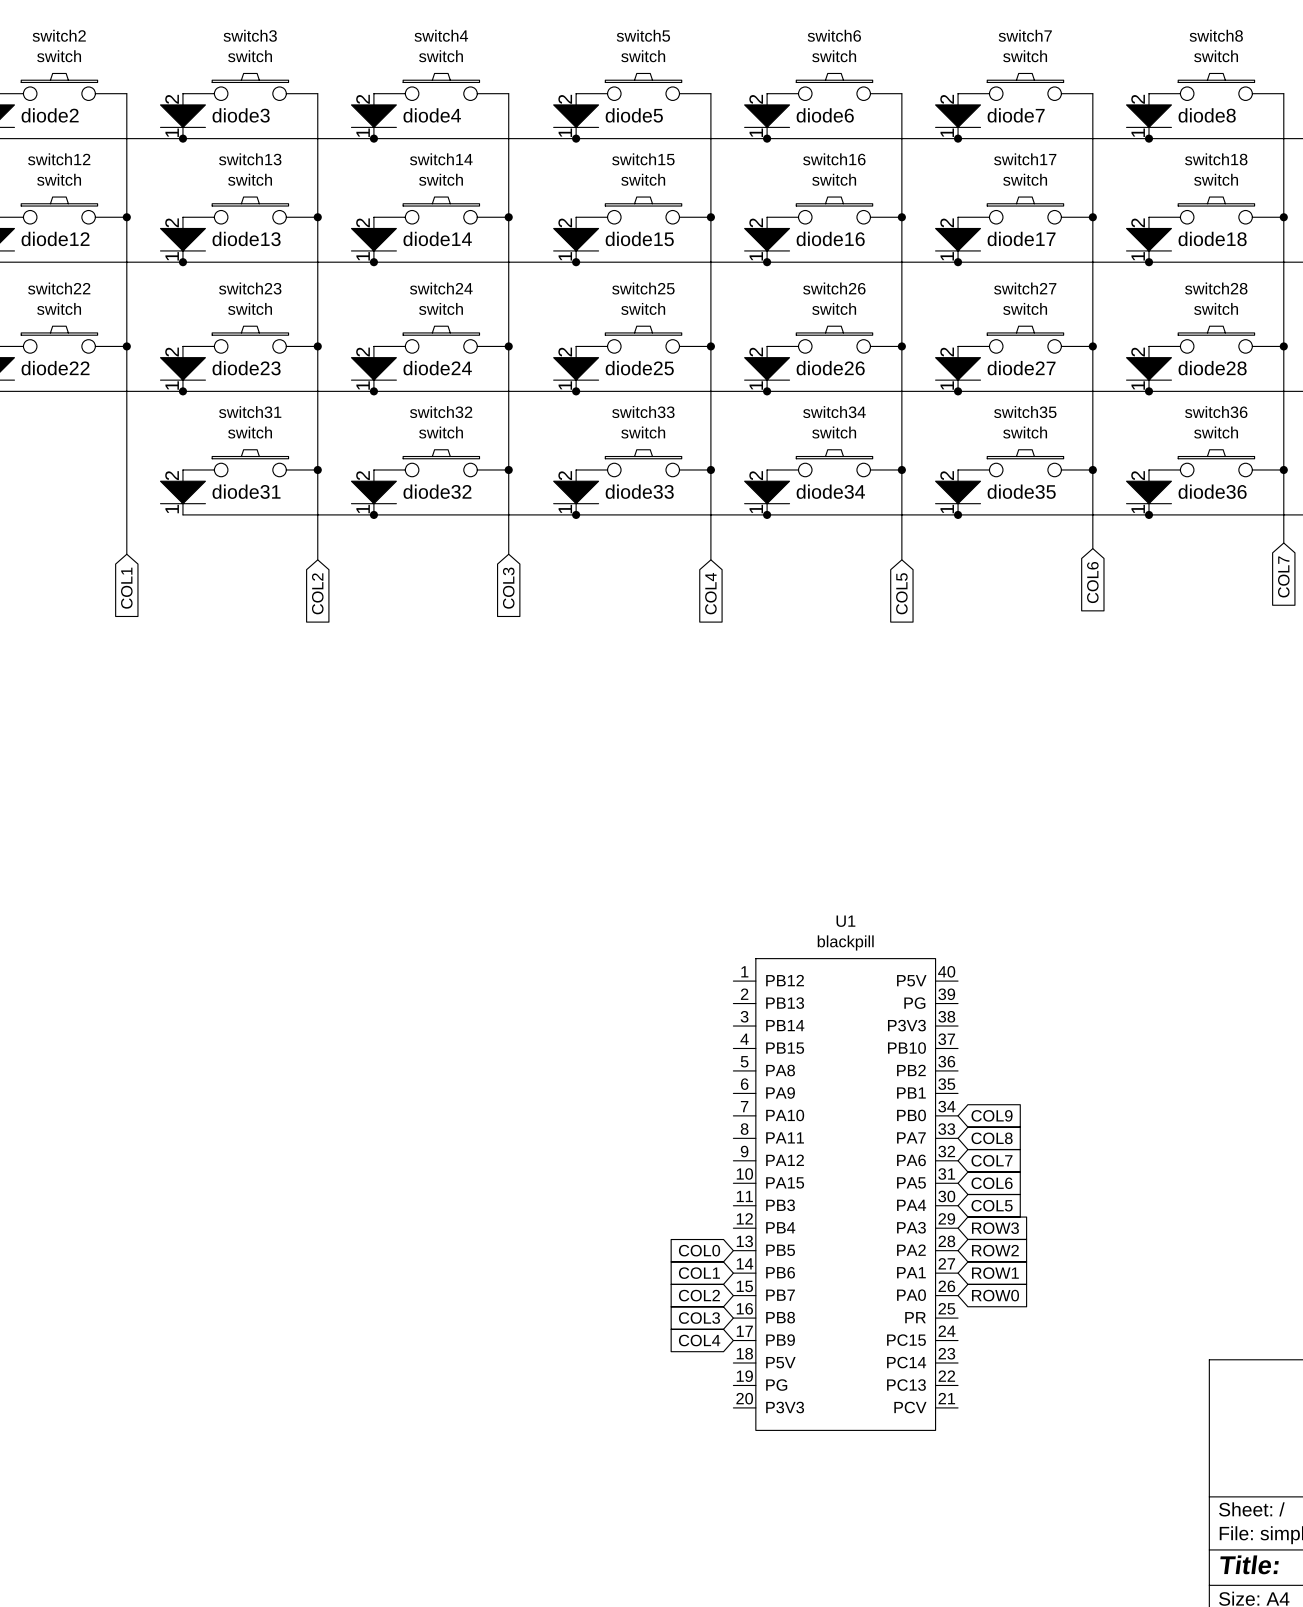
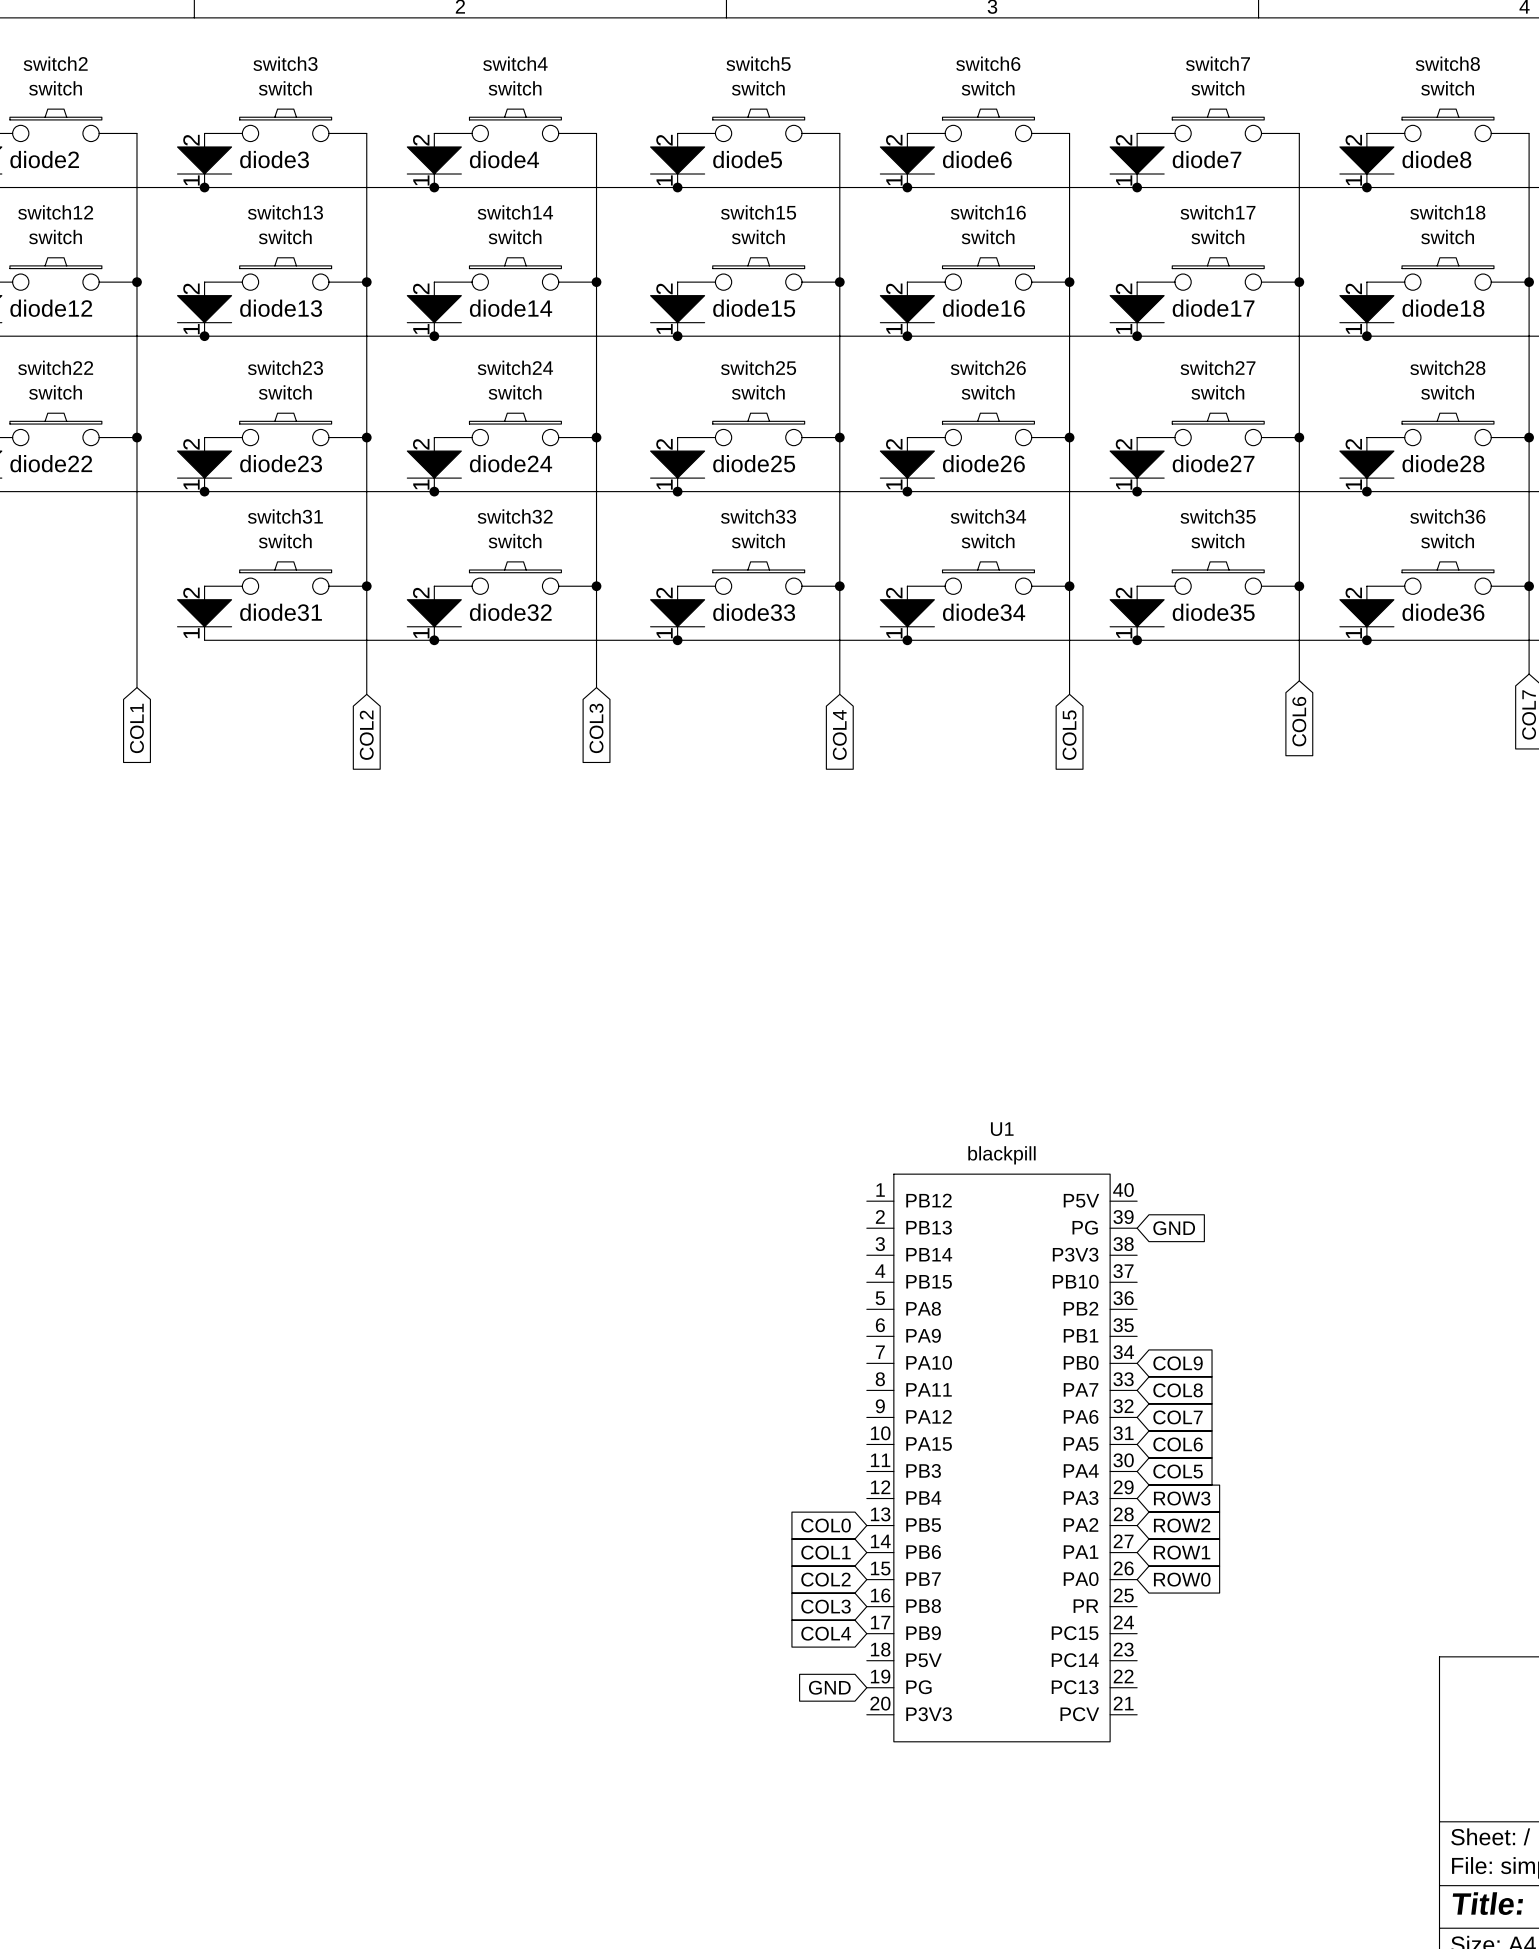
global label: none -> GND (1174, 1228)
global label: none -> GND (829, 1687)

